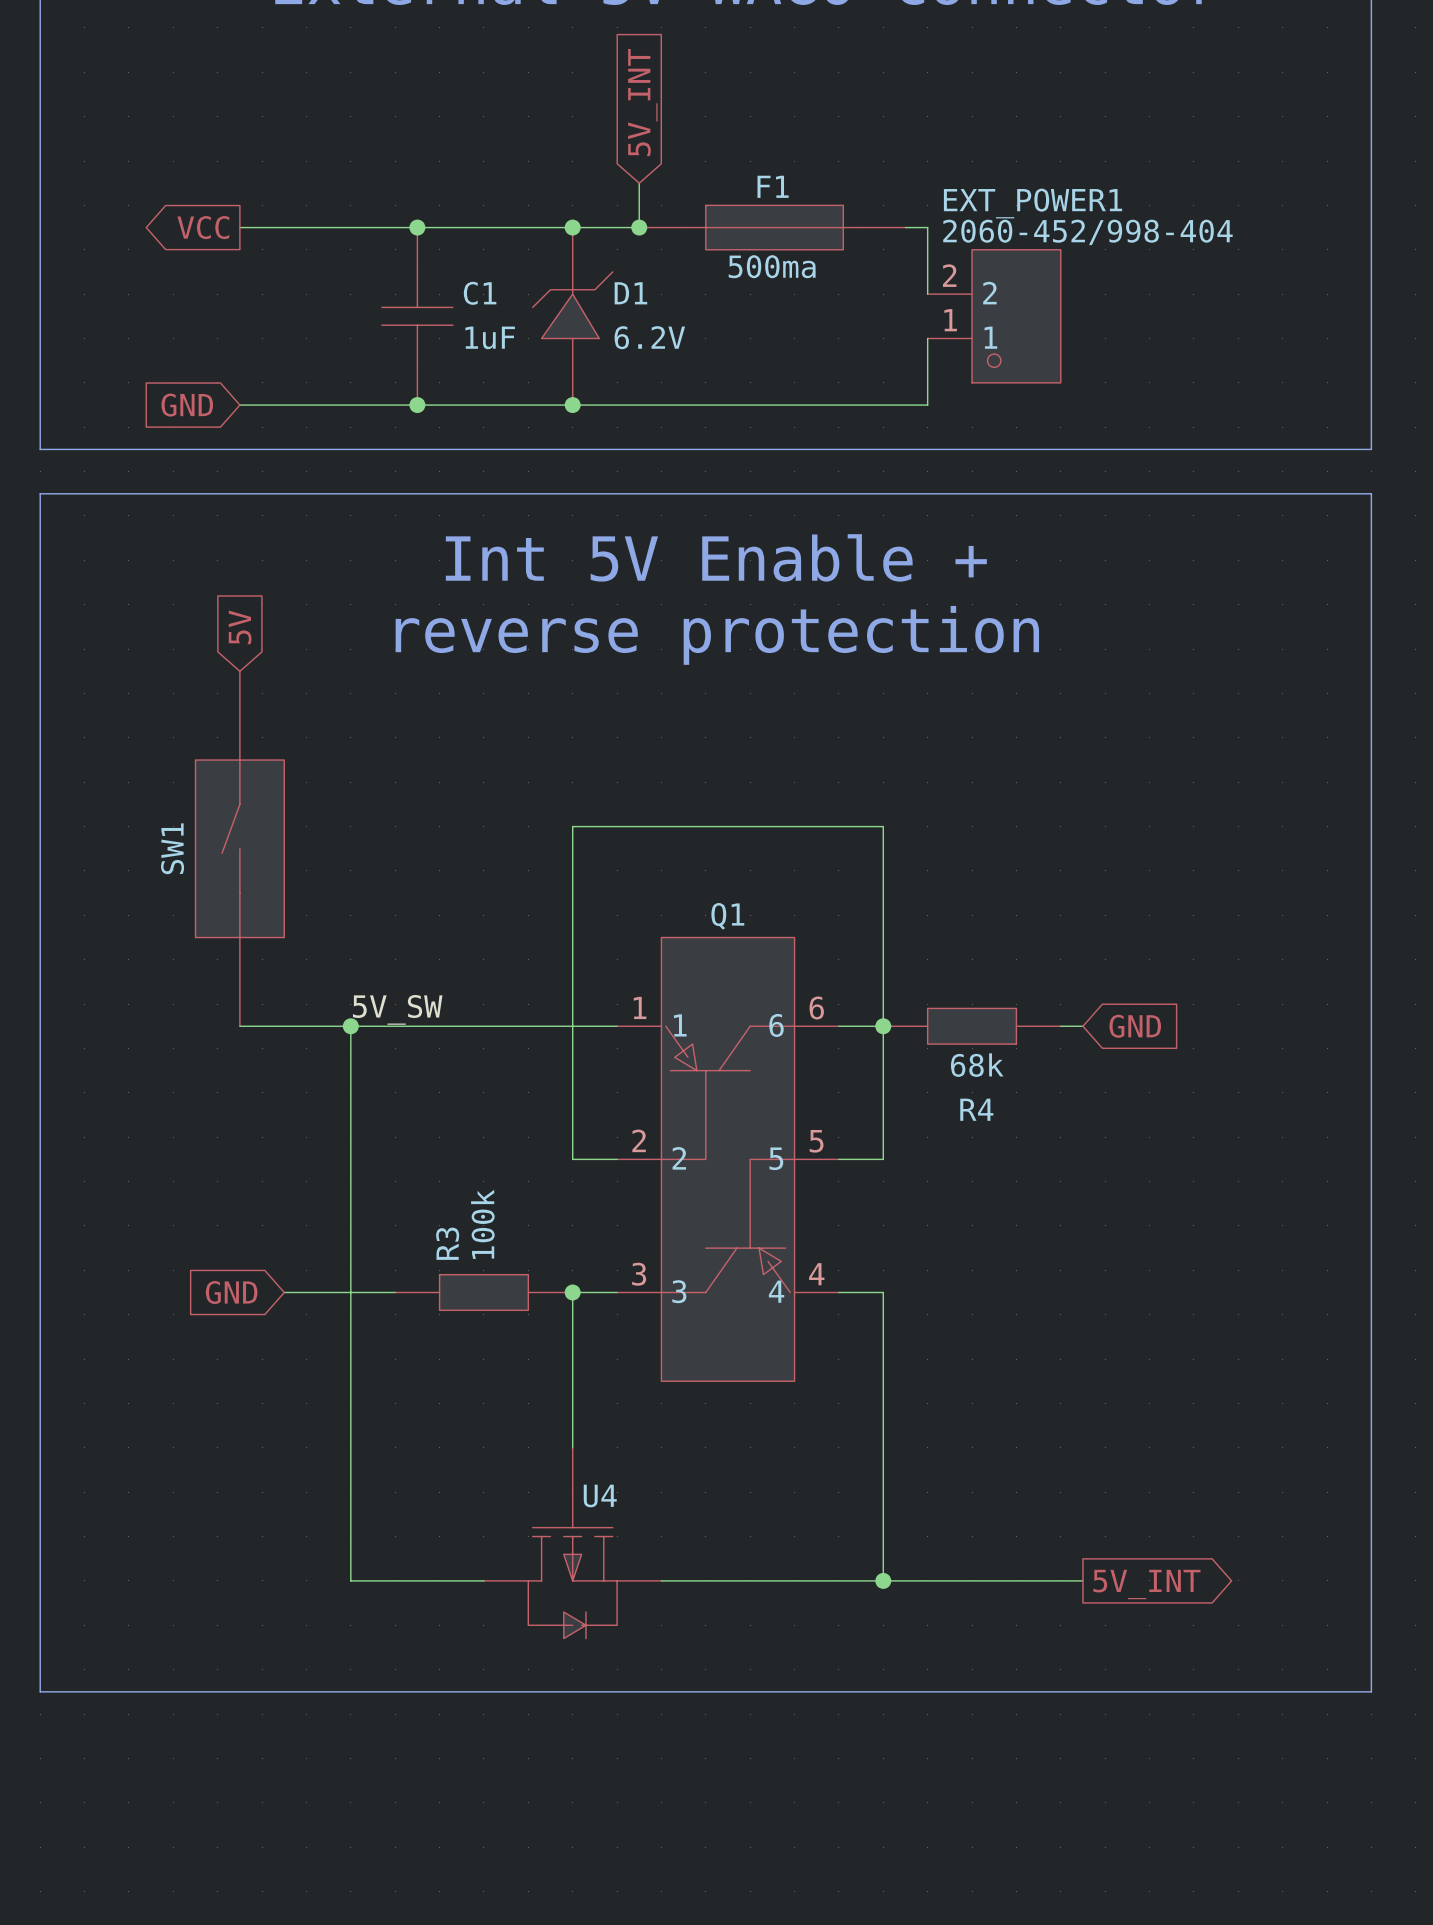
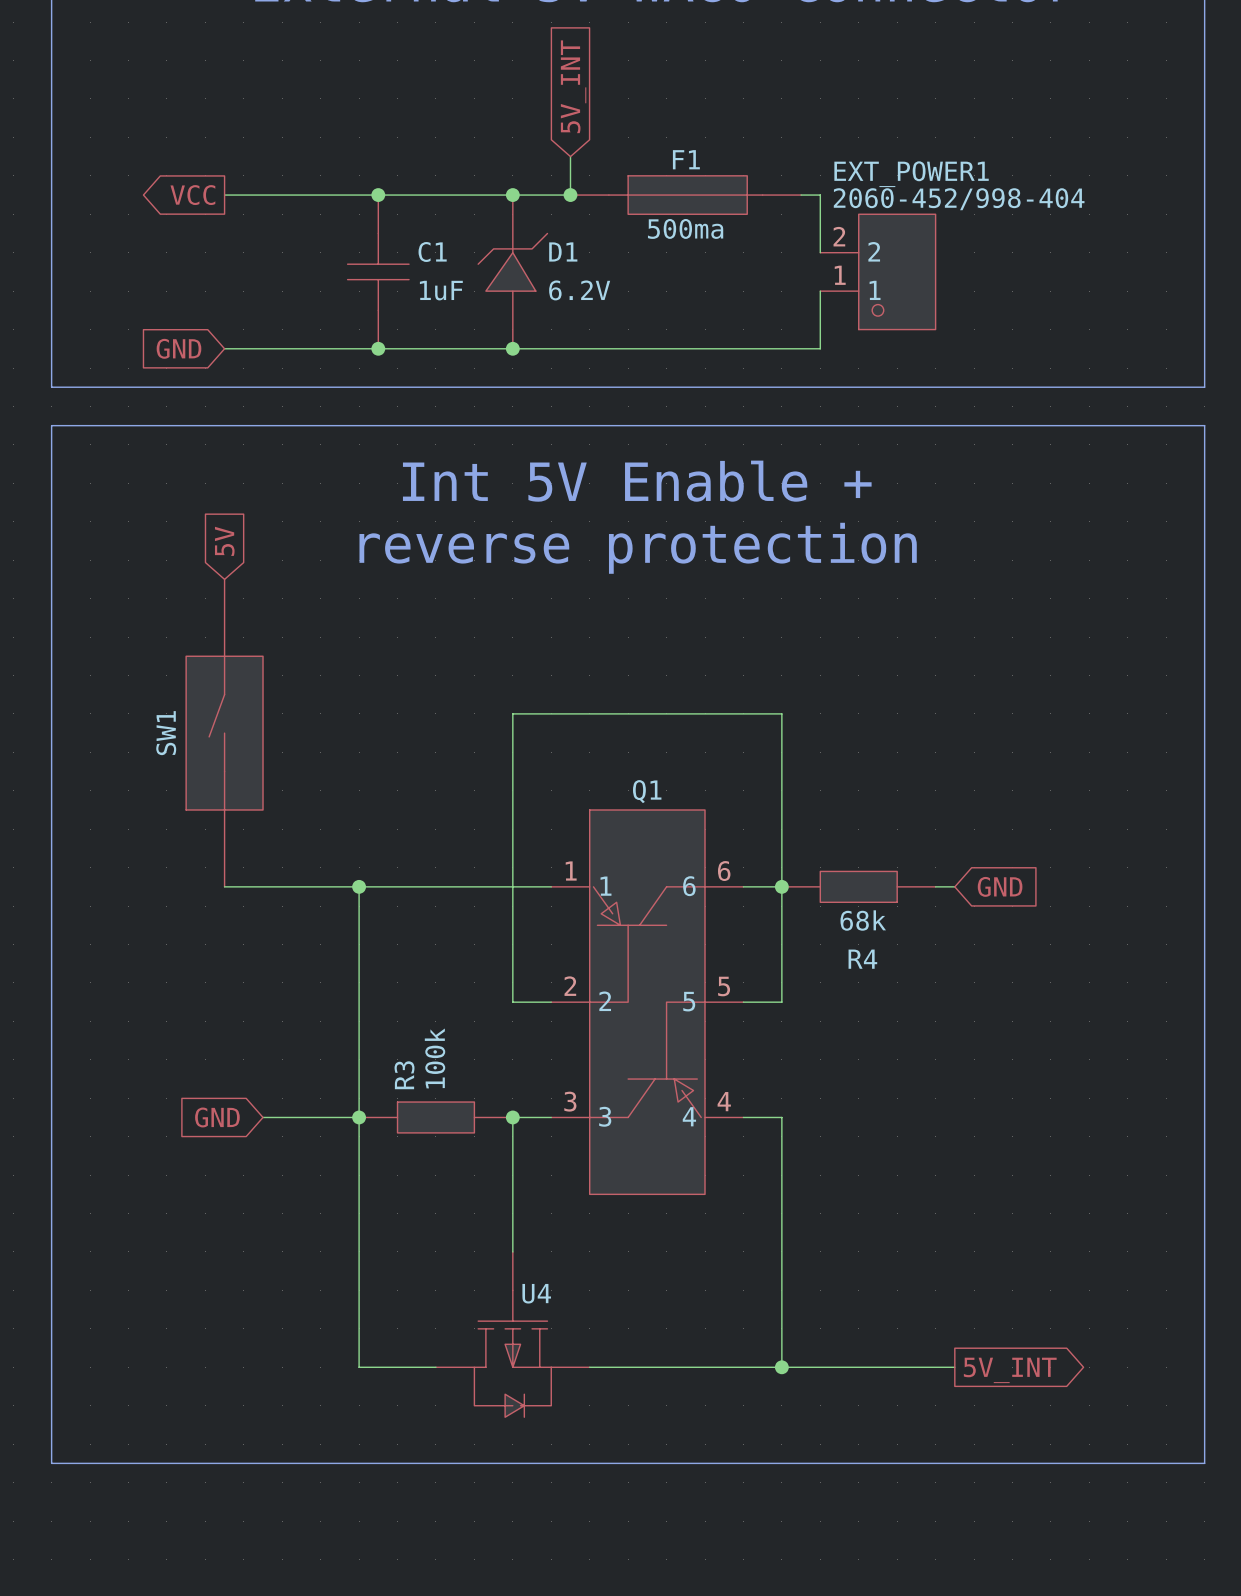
label: 5V_SW (397, 1009) -> none
wire: (350, 1026) (350, 1580) (395, 1580) -> (359, 886) (359, 1367)
junction position: (350, 1026) -> (359, 886)
junction: none -> (359, 1117)

